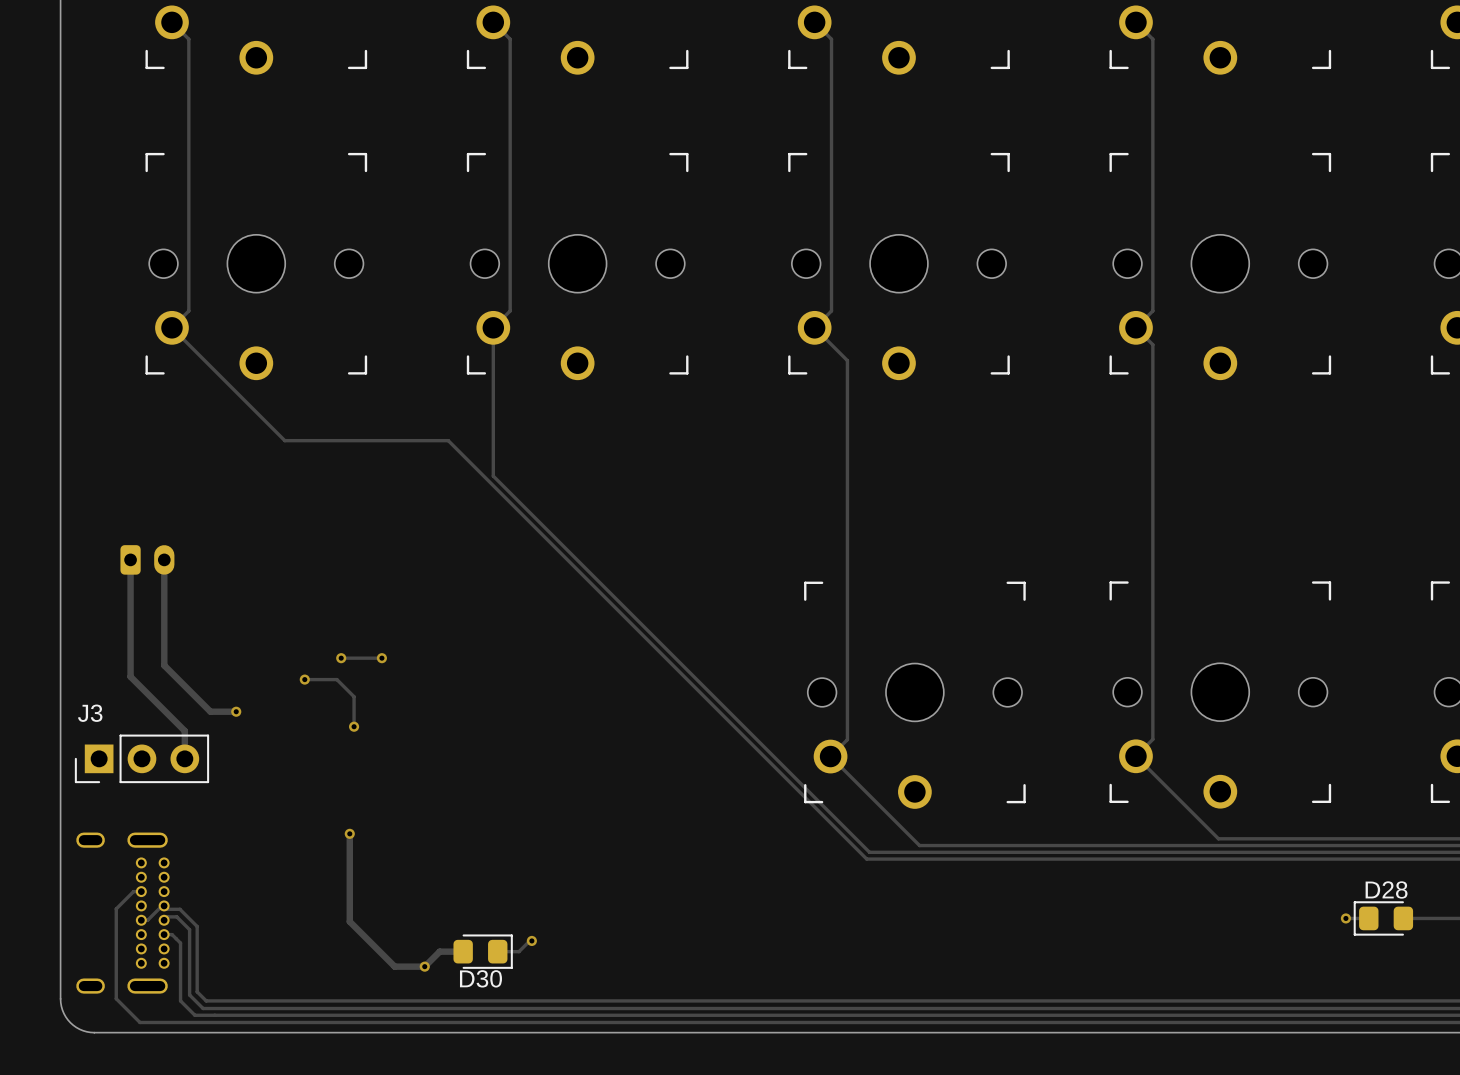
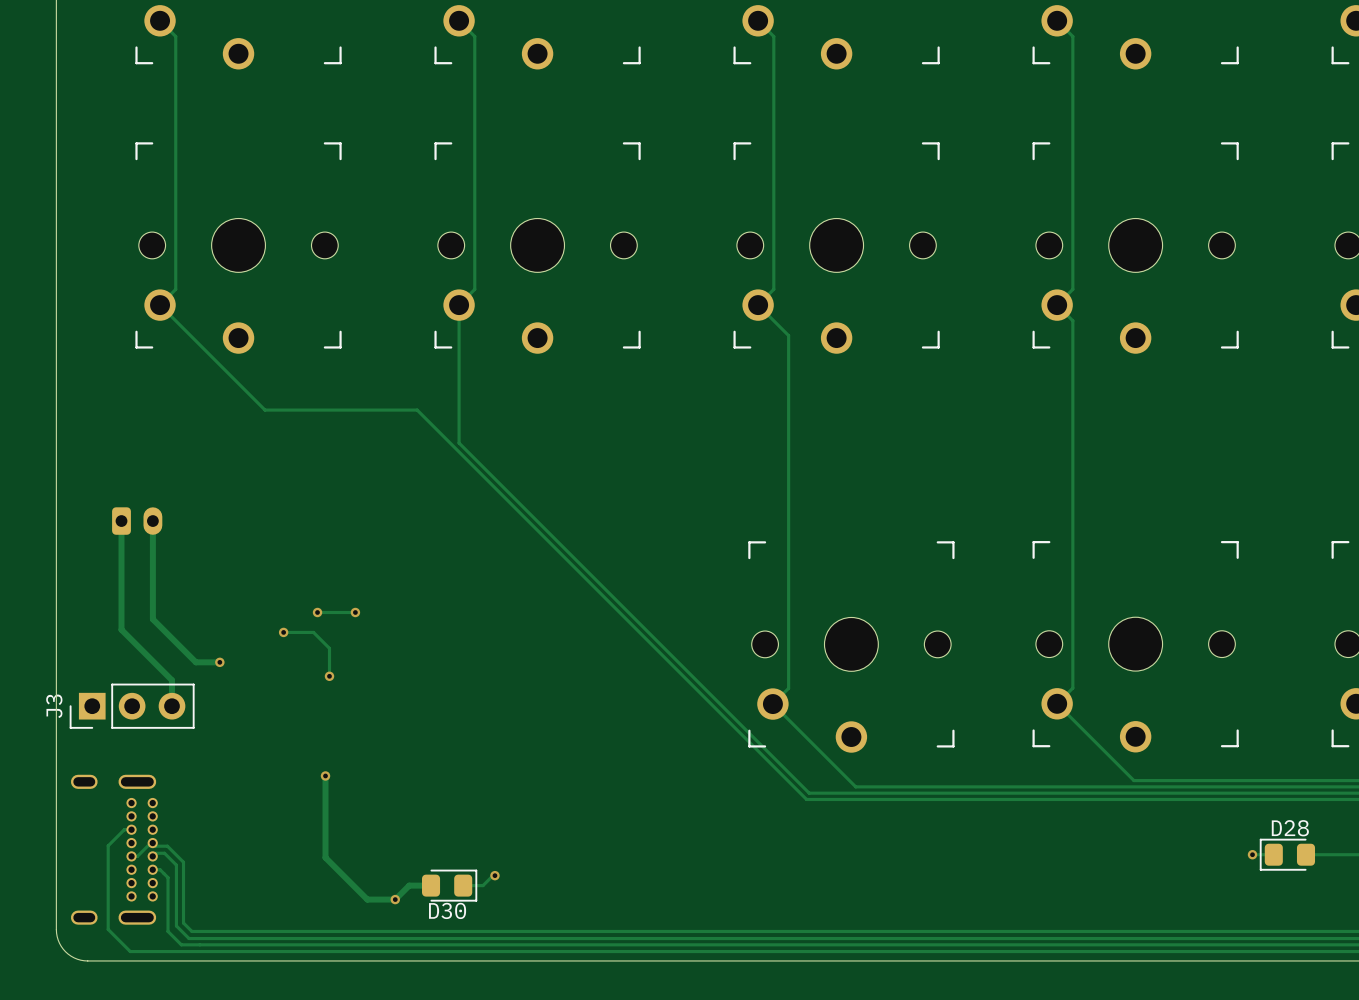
J3 name rotation: 0° (90, 713) -> 90° counterclockwise (54, 706)
J3 name position: J3 (90, 713) -> J3 (54, 706)

